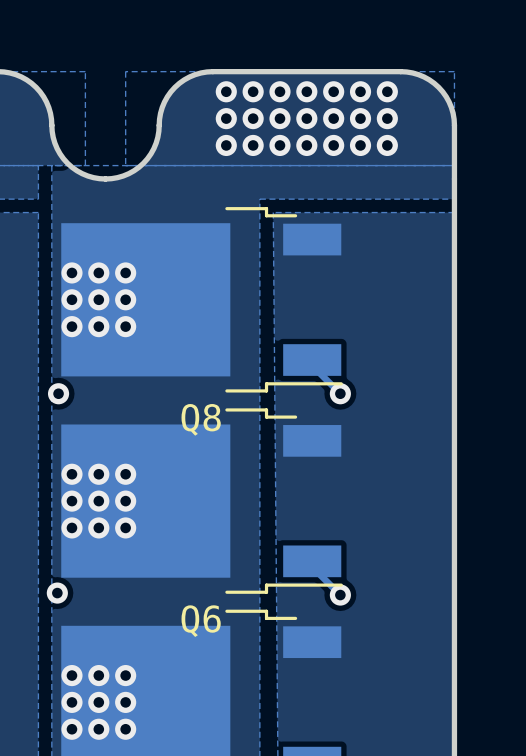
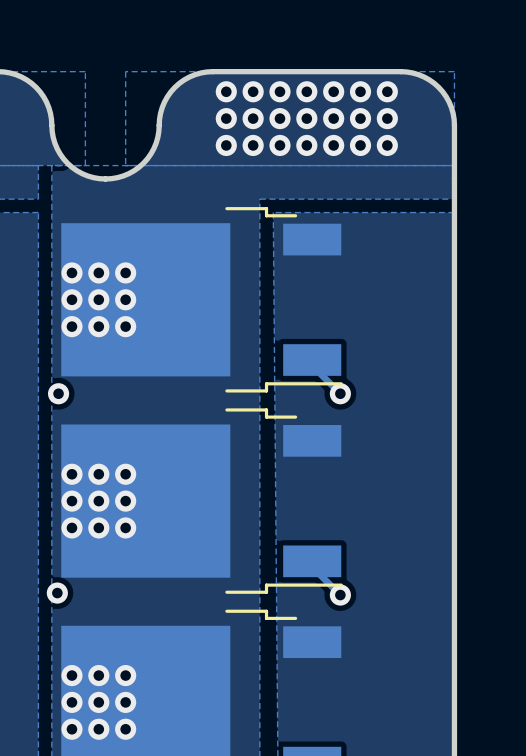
Q8 name: Q8 (201, 419) -> none
Q6 name: Q6 (201, 621) -> none

